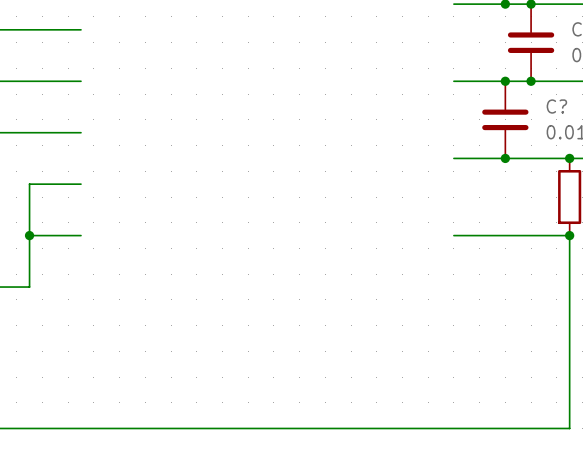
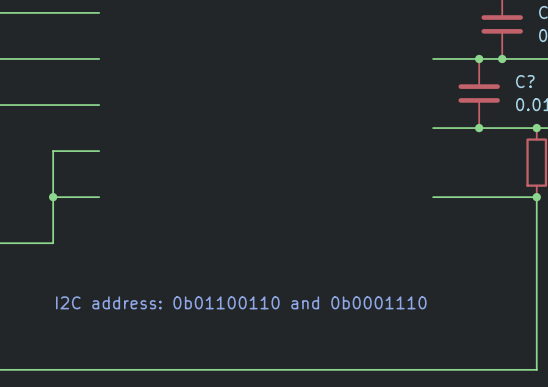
text: none -> I2C address: 0b01100110 and 0b0001110 (241, 302)

